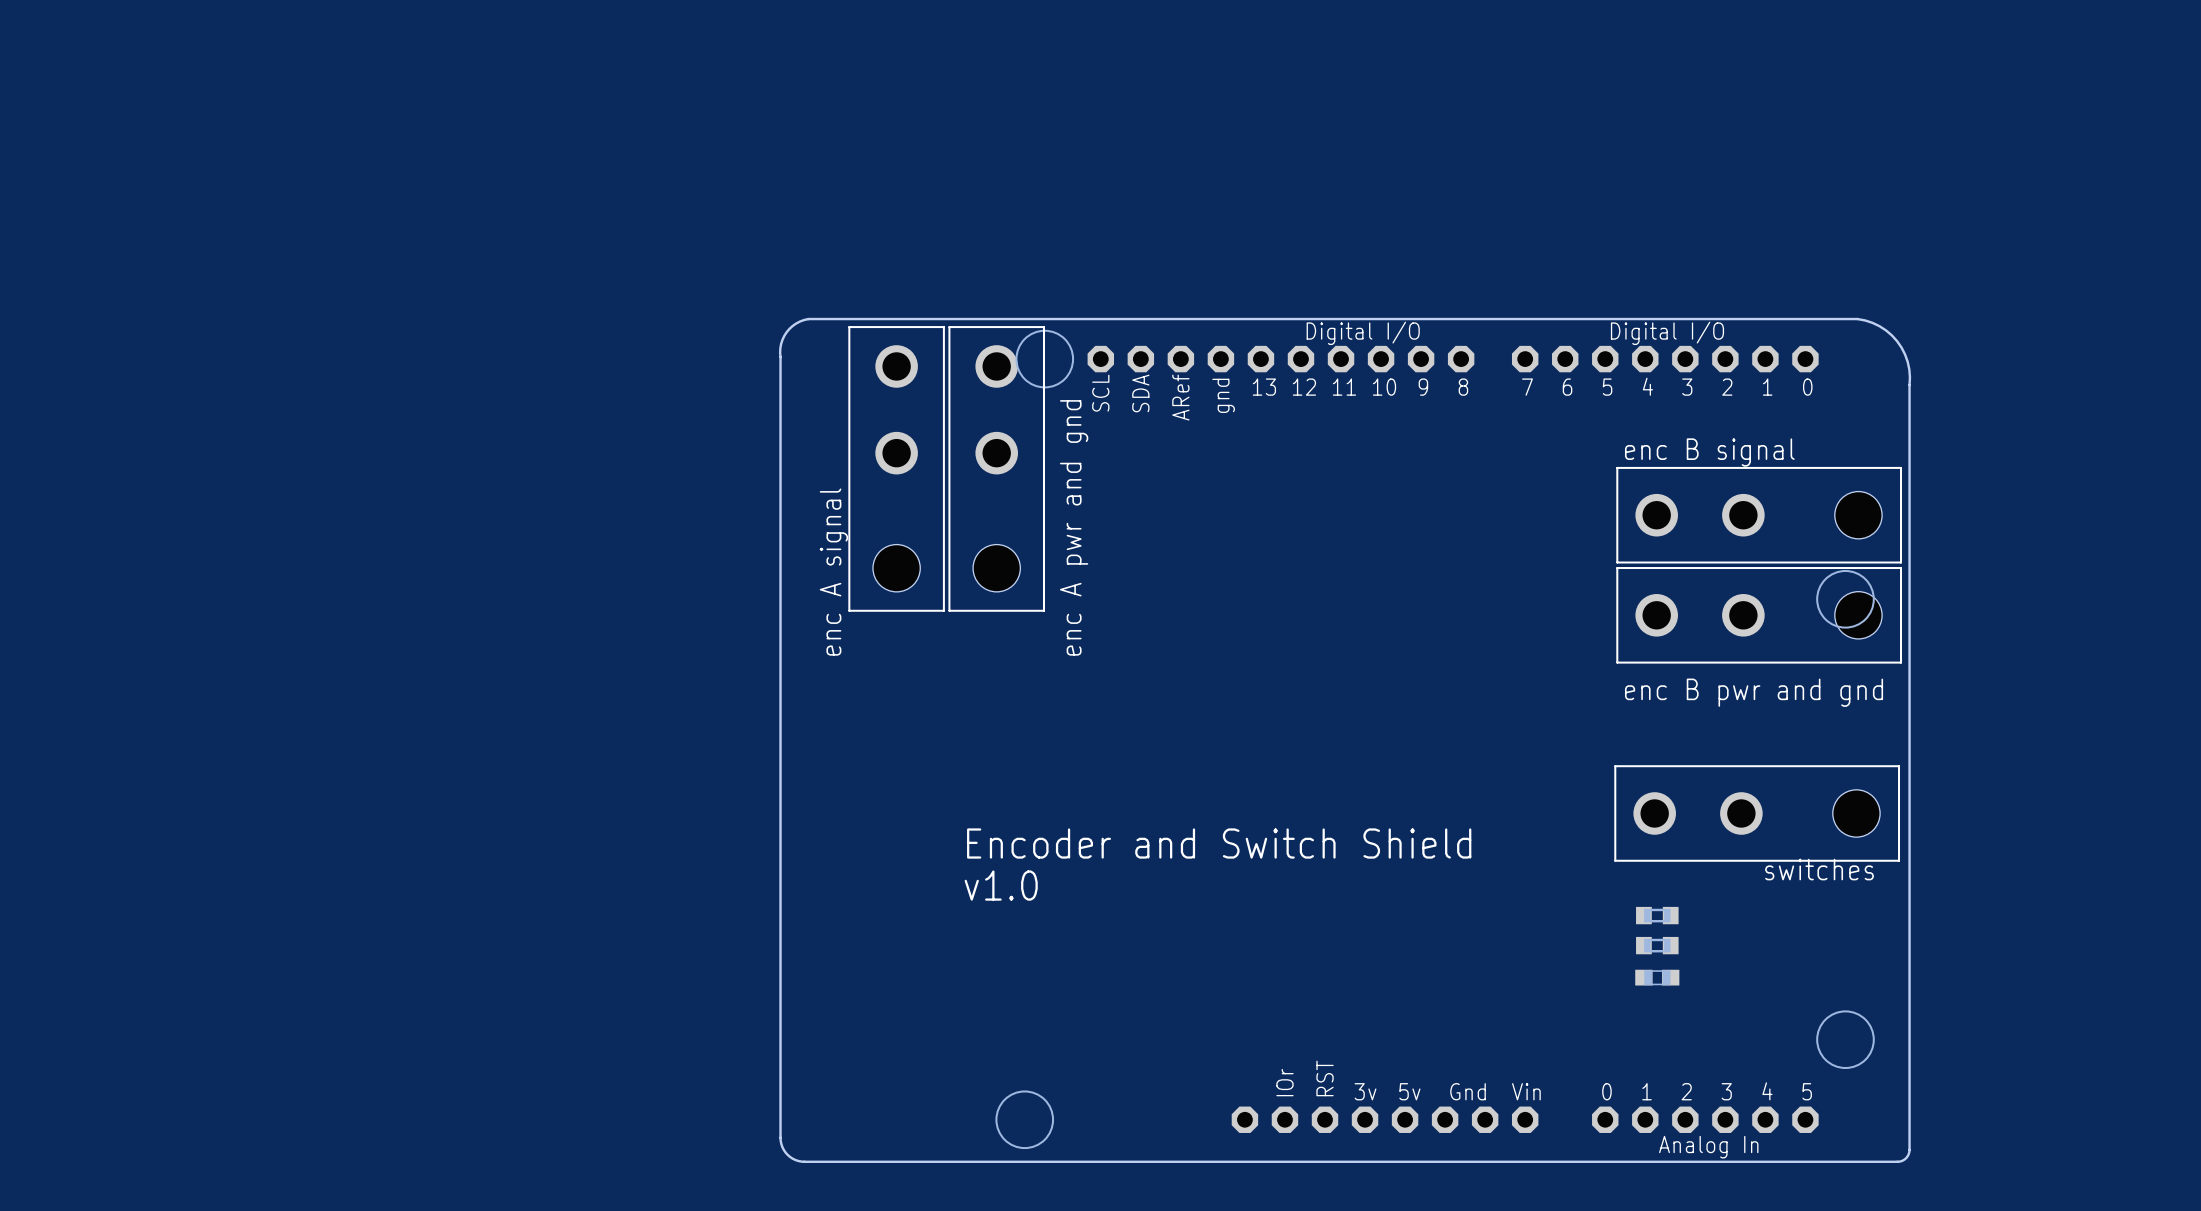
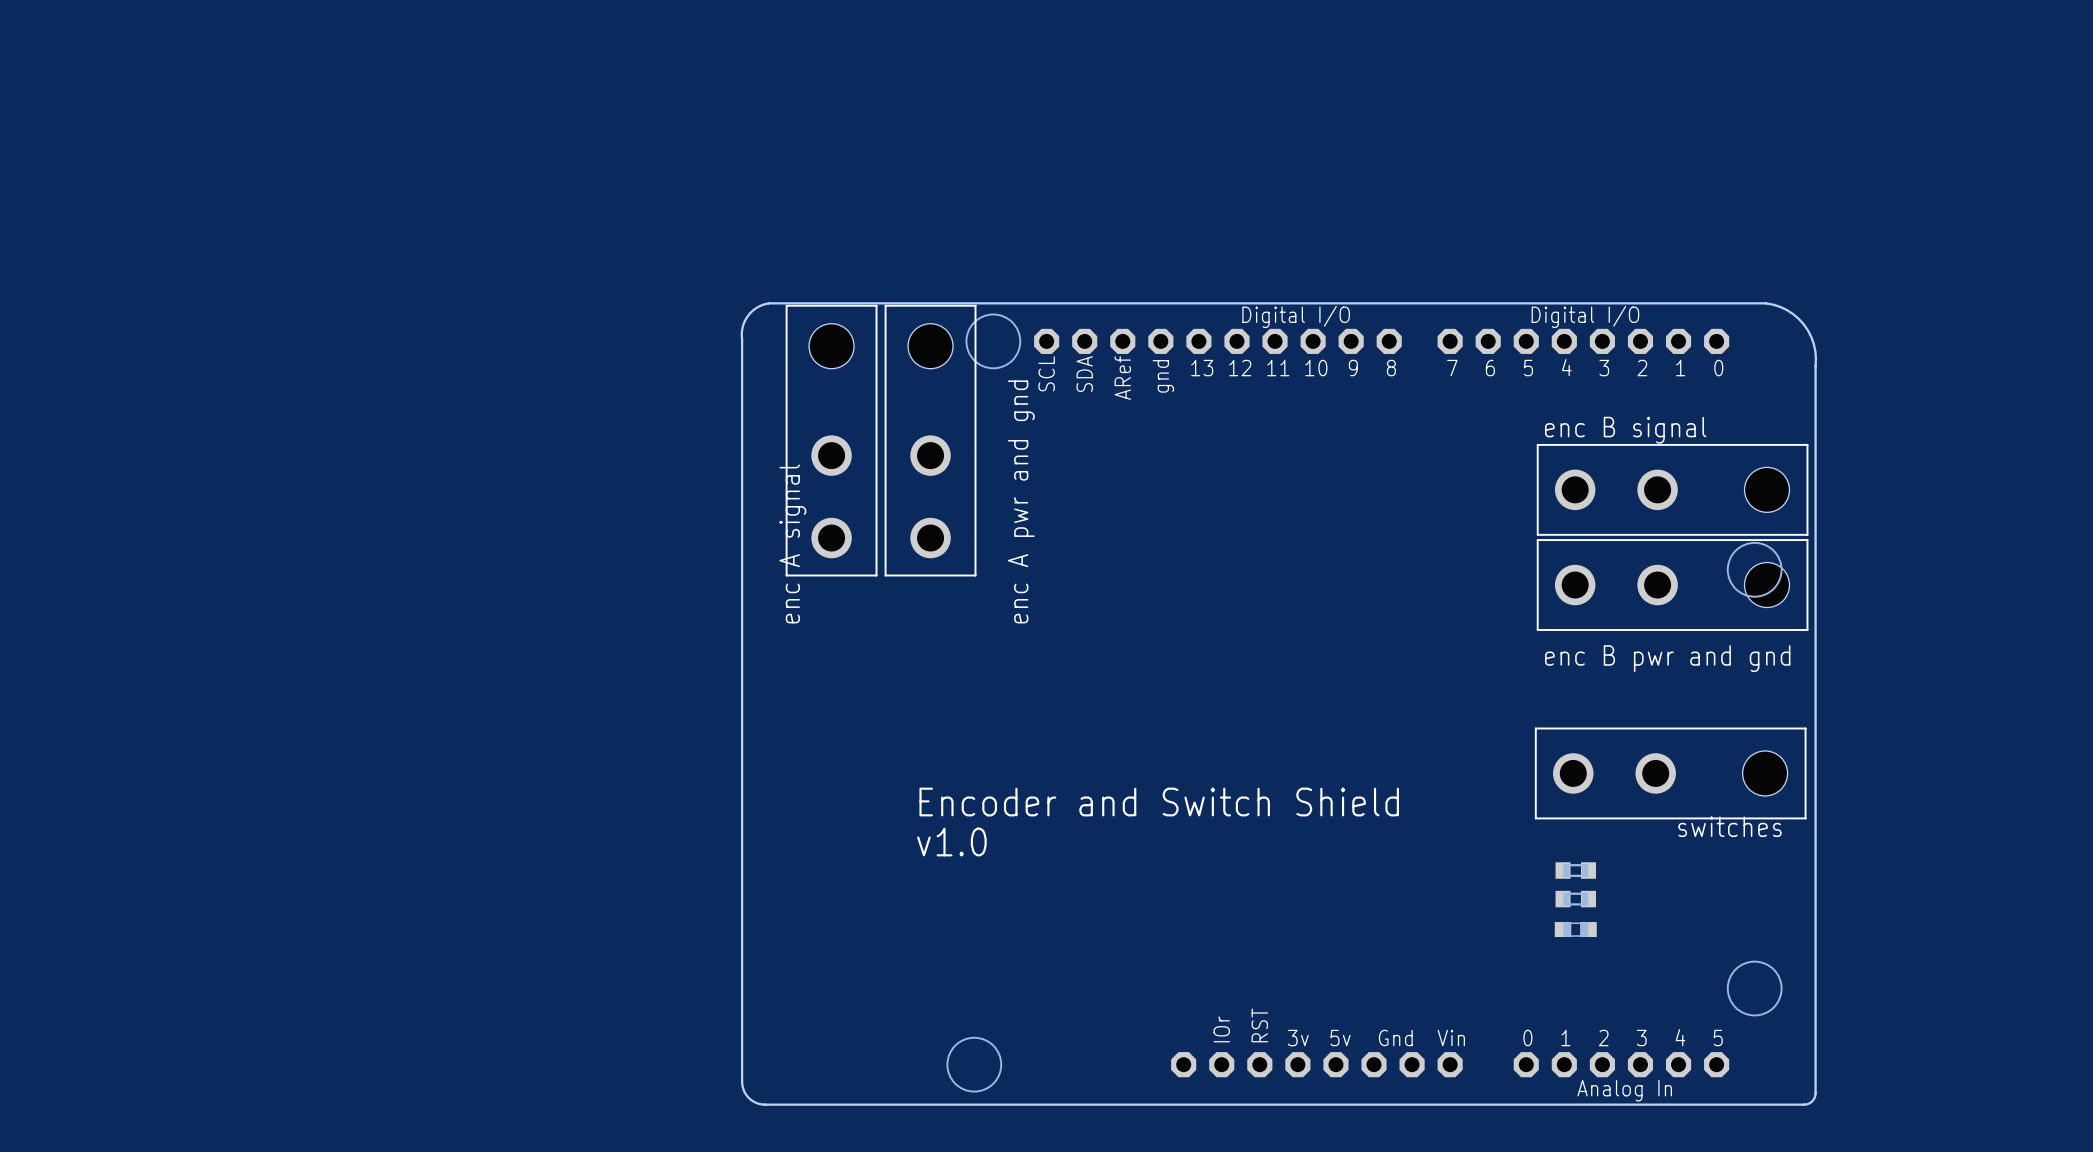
part rotation: 0° (896, 468) -> 180° (831, 440)
part rotation: 0° (996, 468) -> 180° (930, 440)

